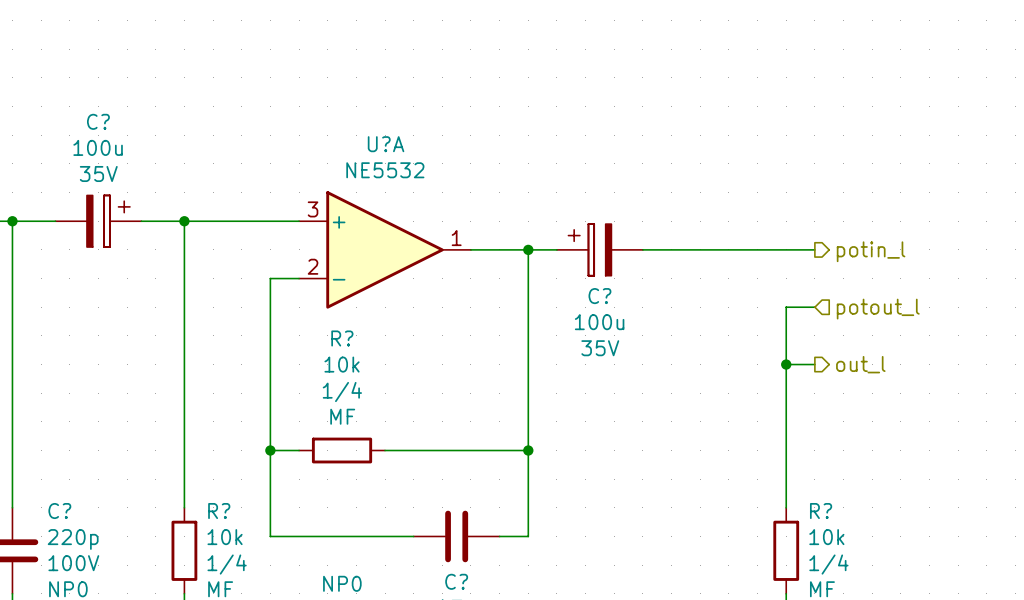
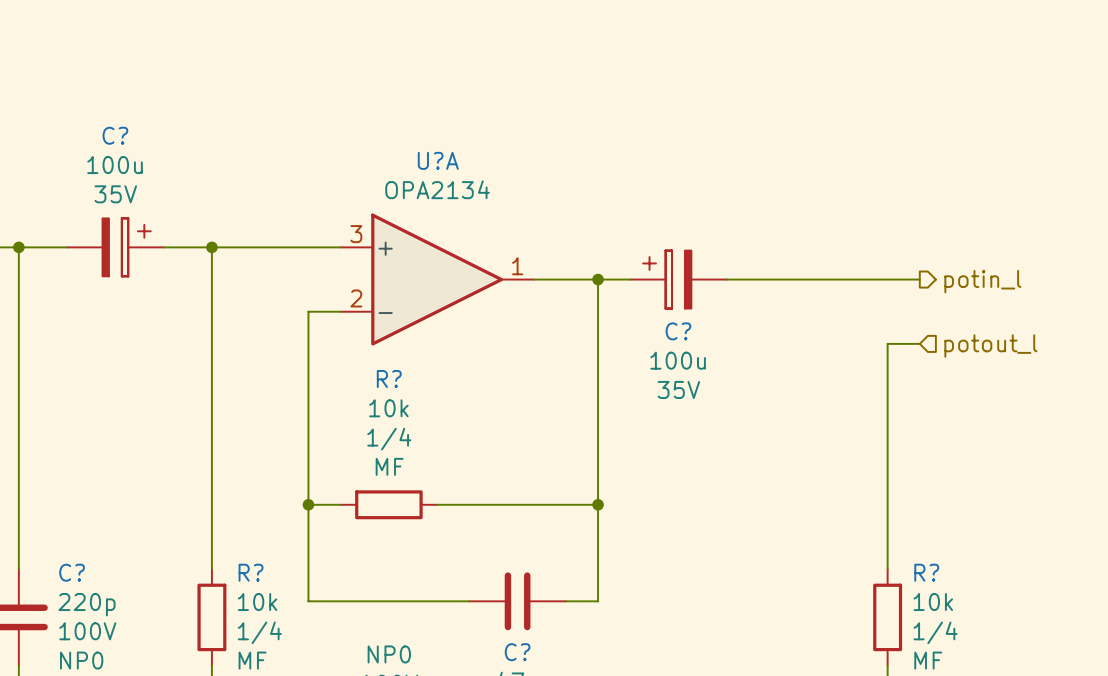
U?A value: NE5532 (385, 170) -> OPA2134 (437, 189)
wire: (786, 364) (814, 364) -> none
junction: (786, 364) -> none
hierarchical label: out_l (860, 364) -> none

